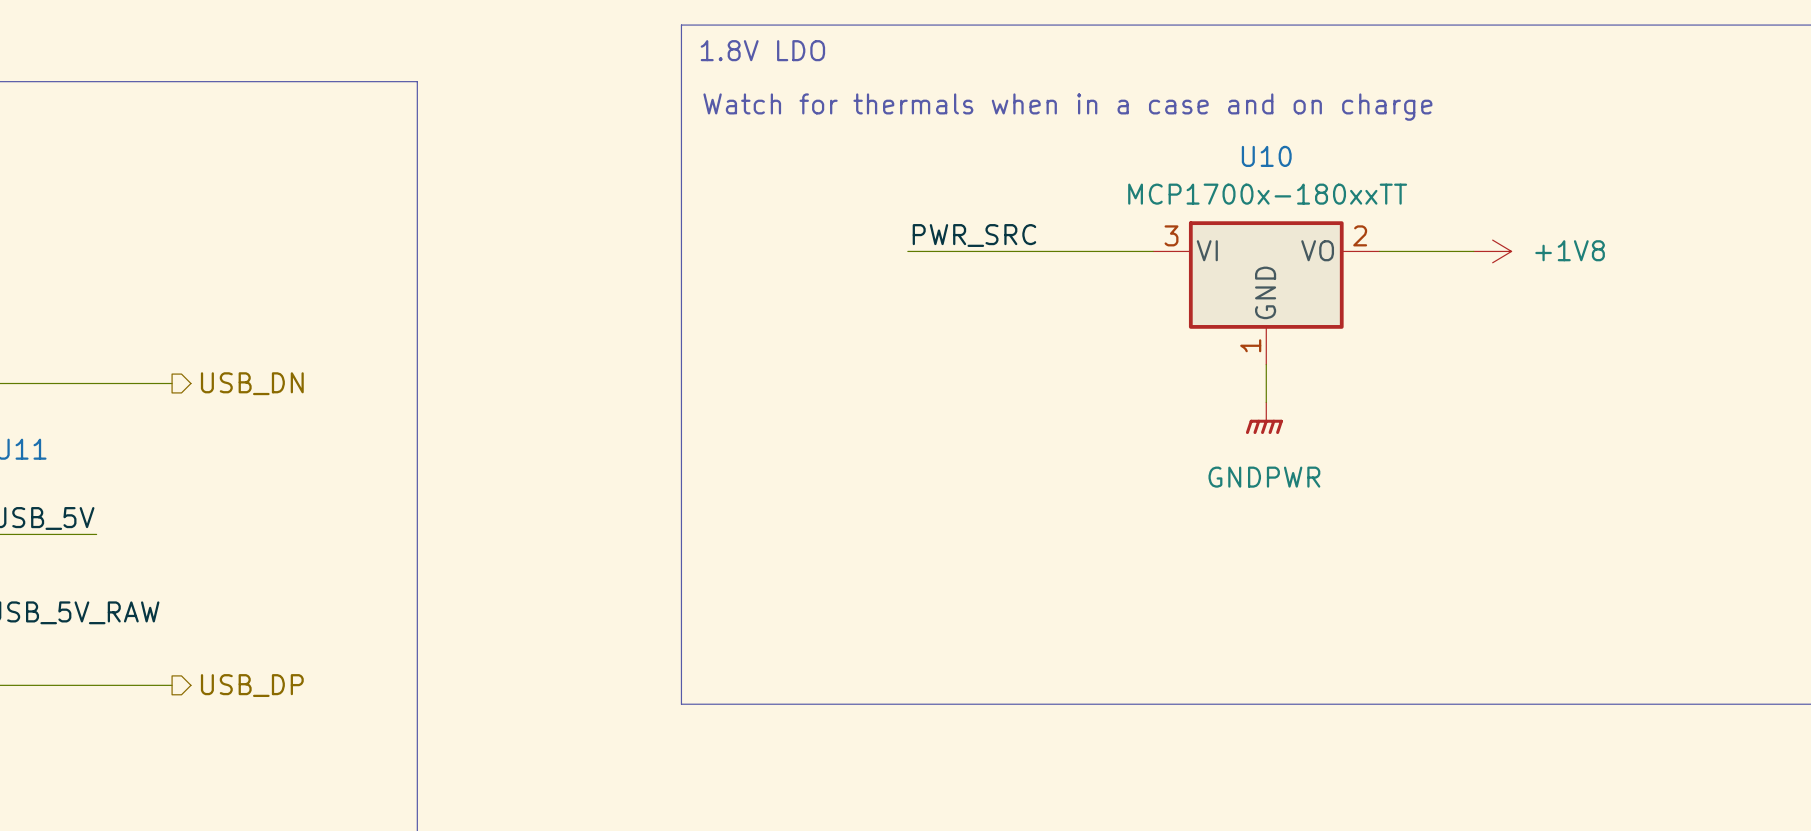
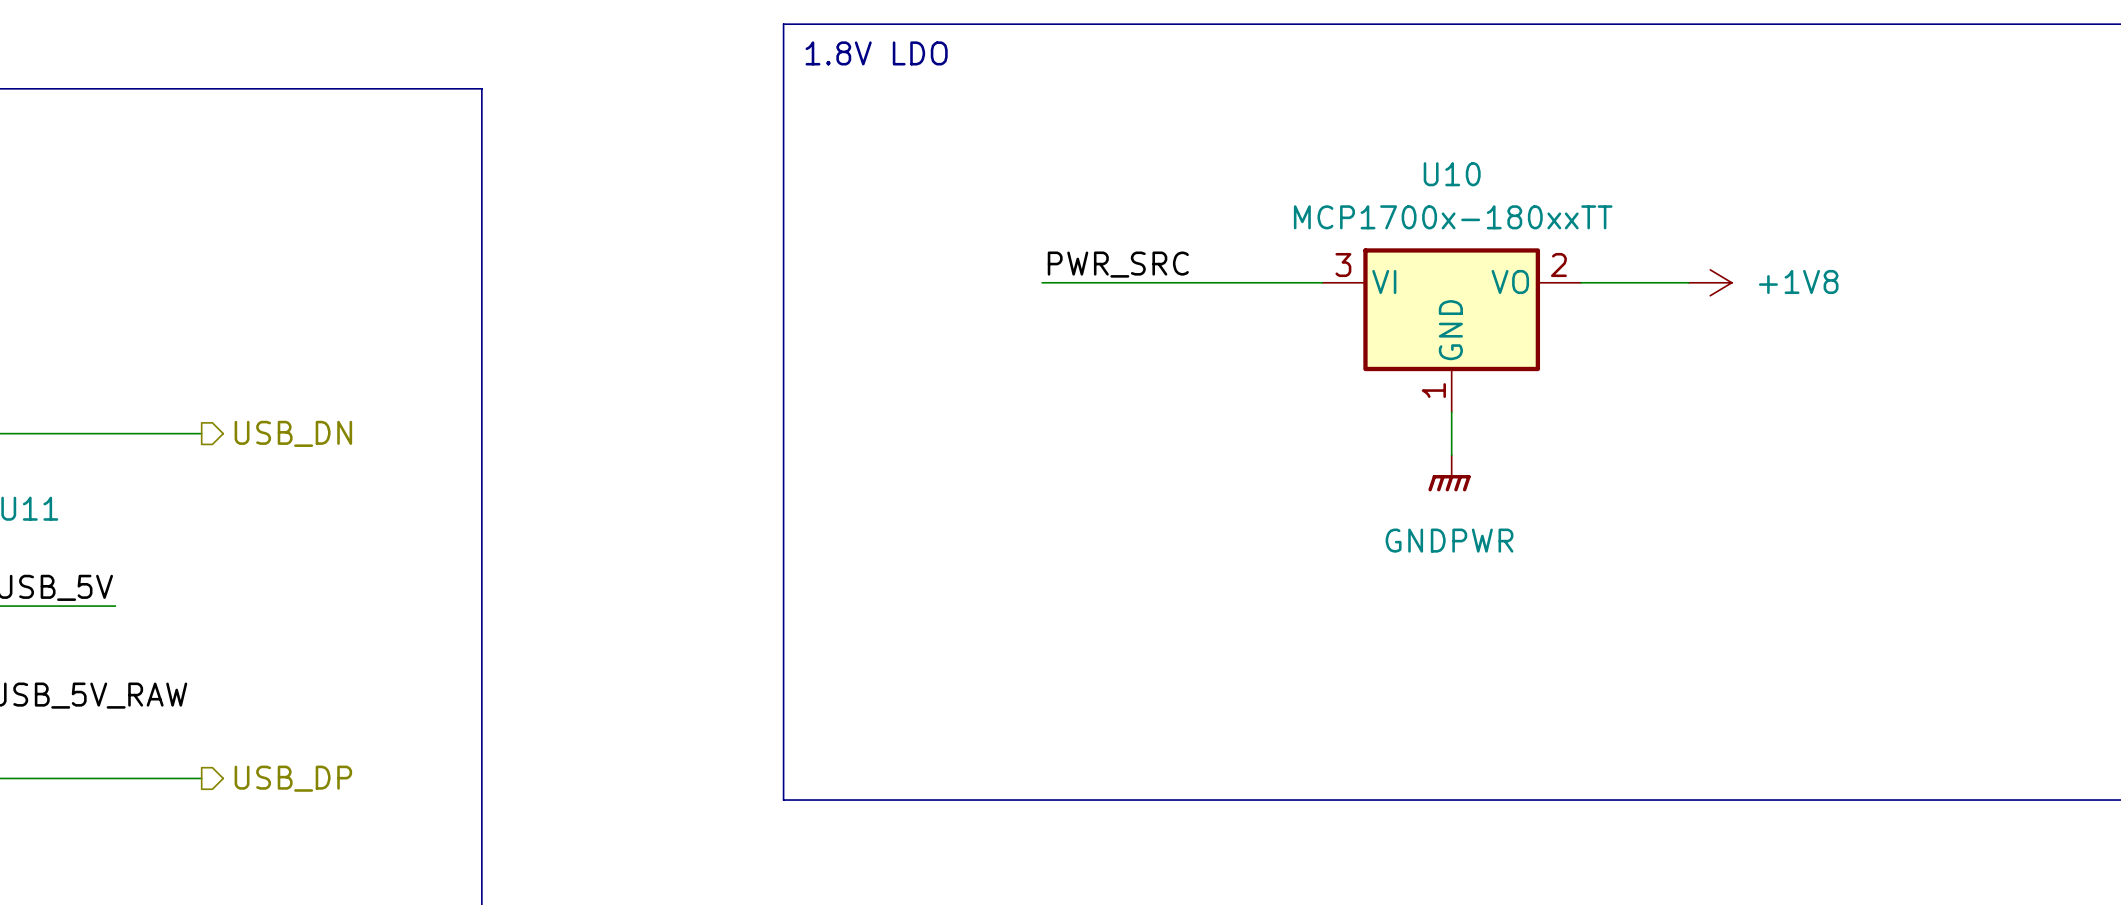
text: Watch for thermals when in a case and on charge (1067, 107) -> none

